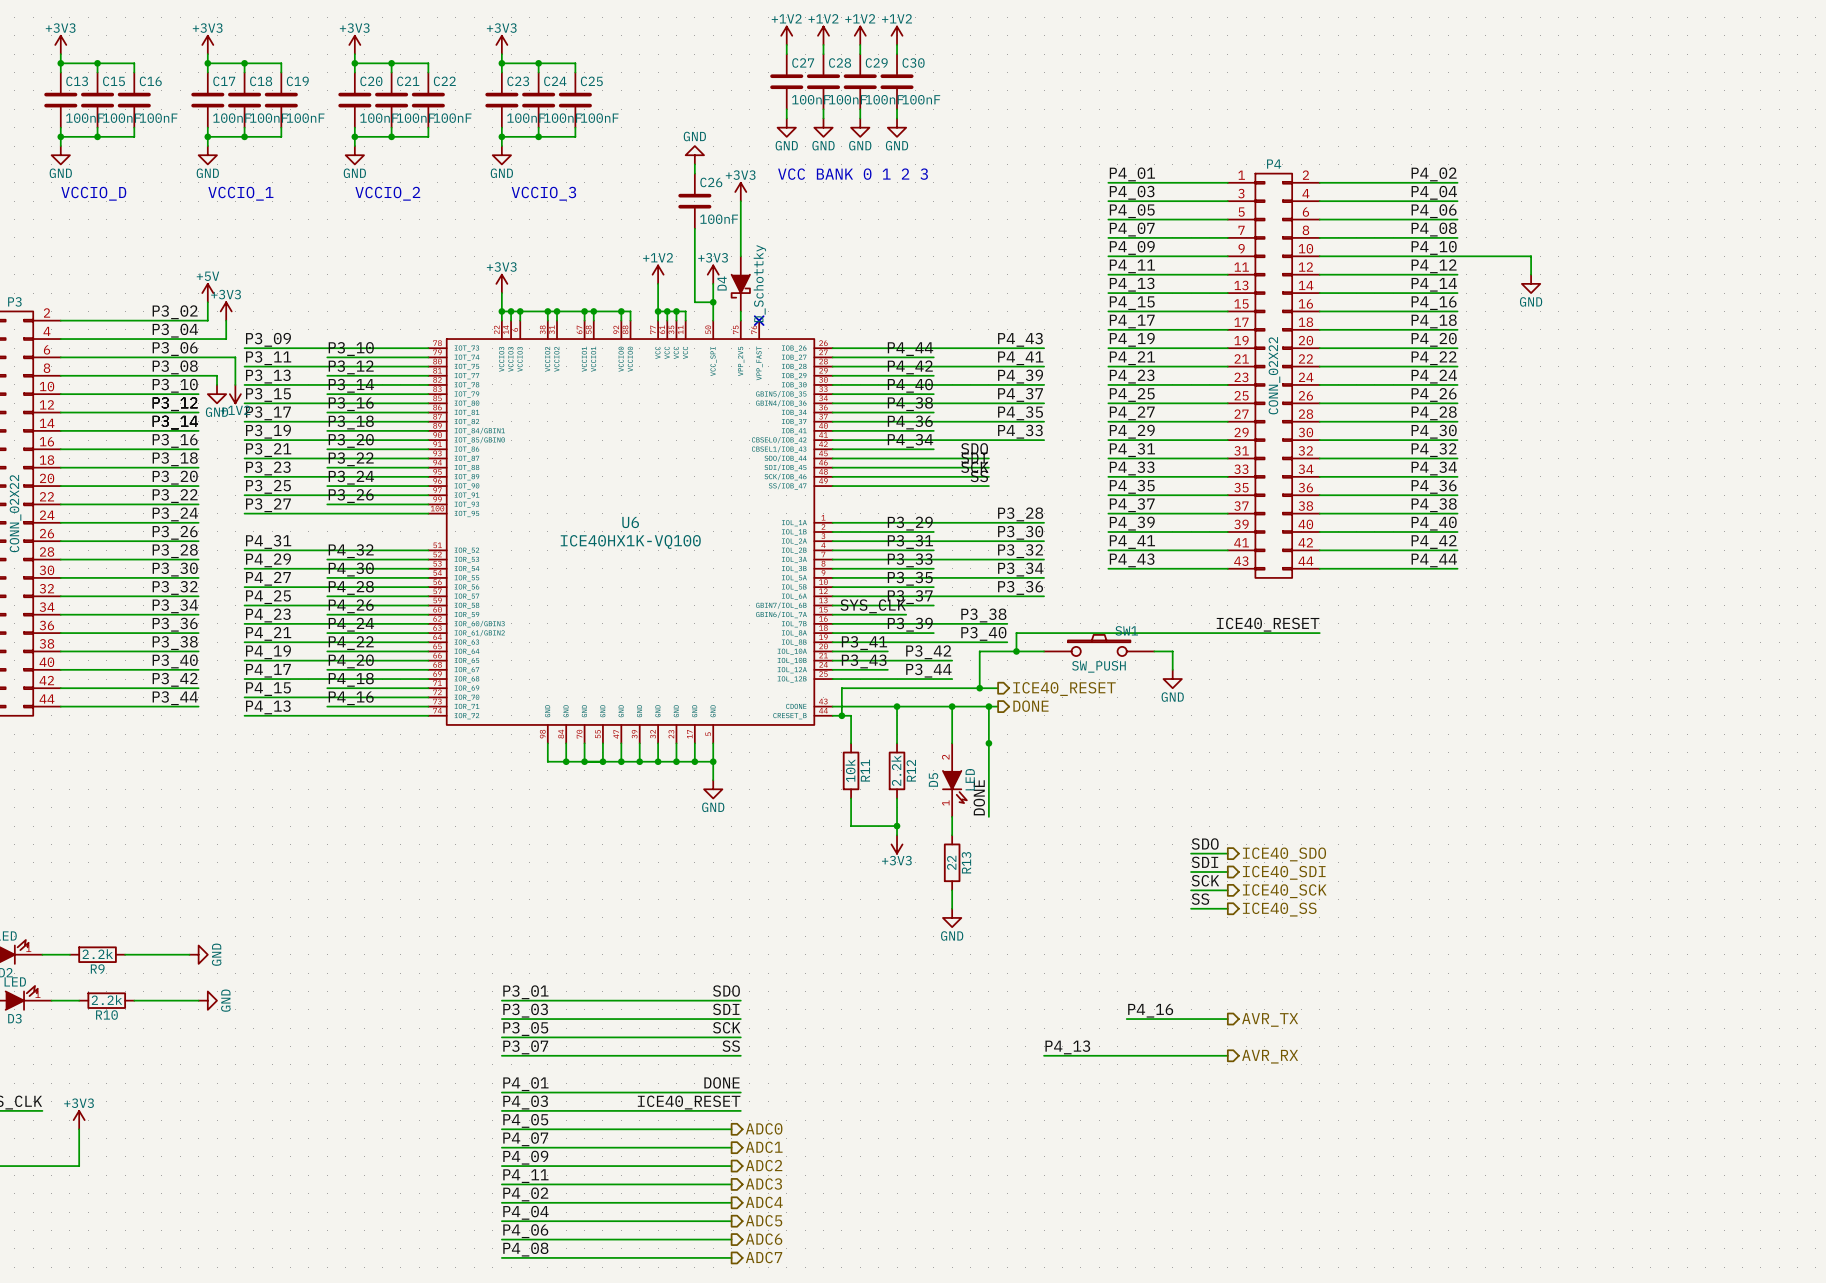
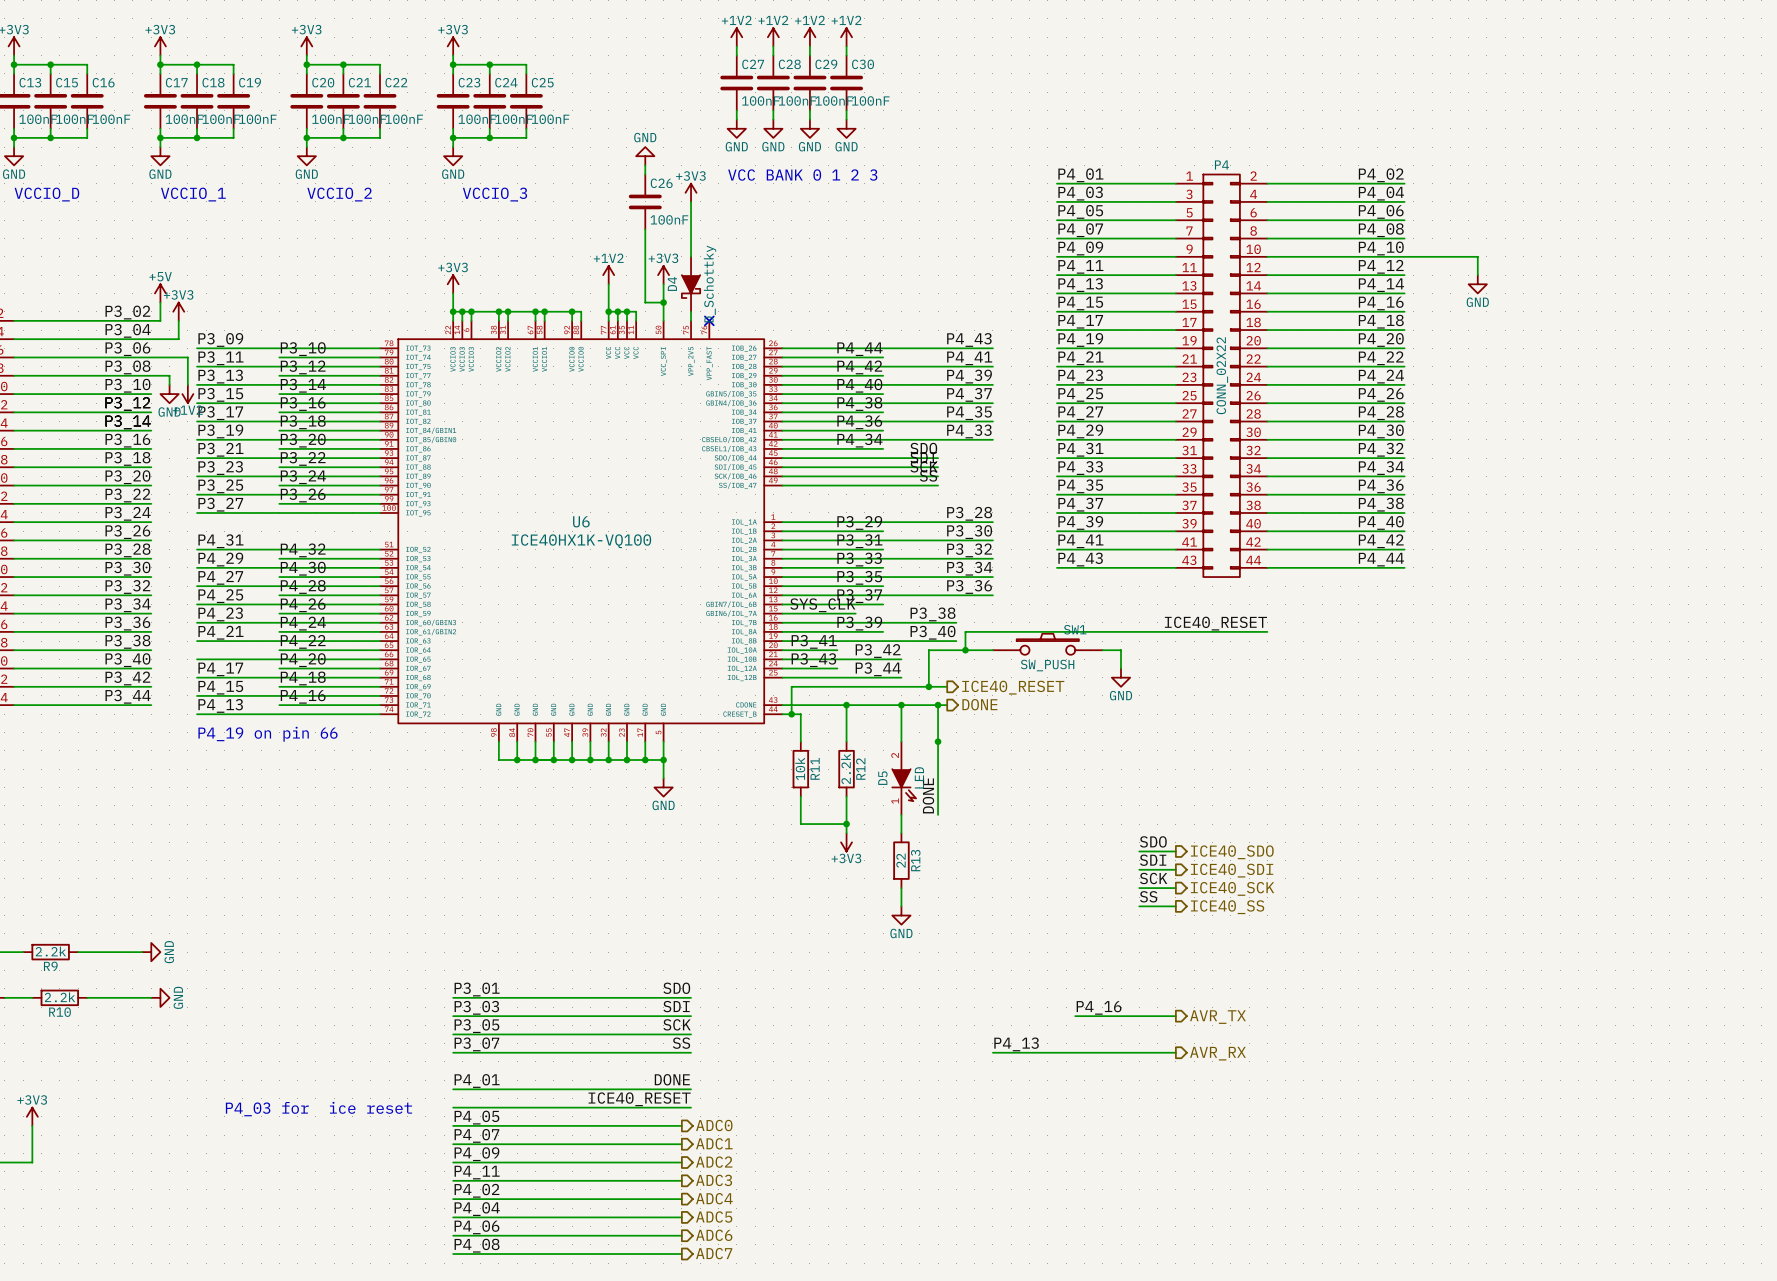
label: P4_19 (268, 652) -> none
text: none -> P4_19 on pin 66 (268, 734)
label: P4_03 (525, 1102) -> none
text: none -> P4_03 for ice reset (318, 1109)

